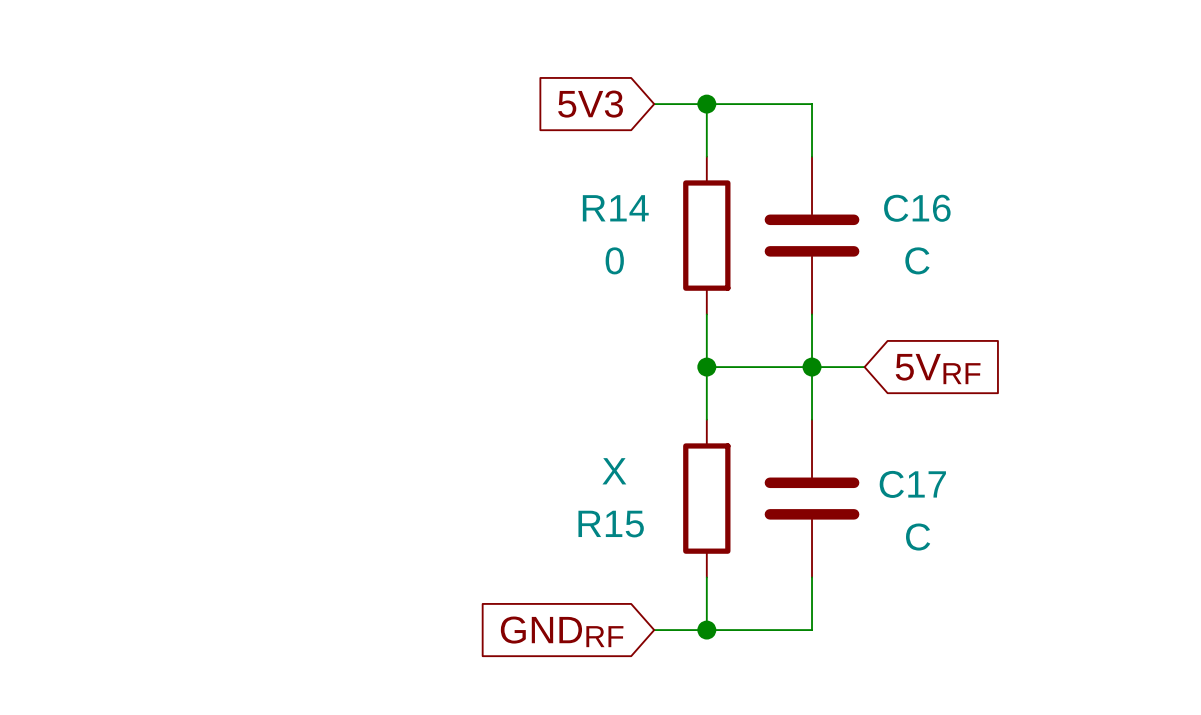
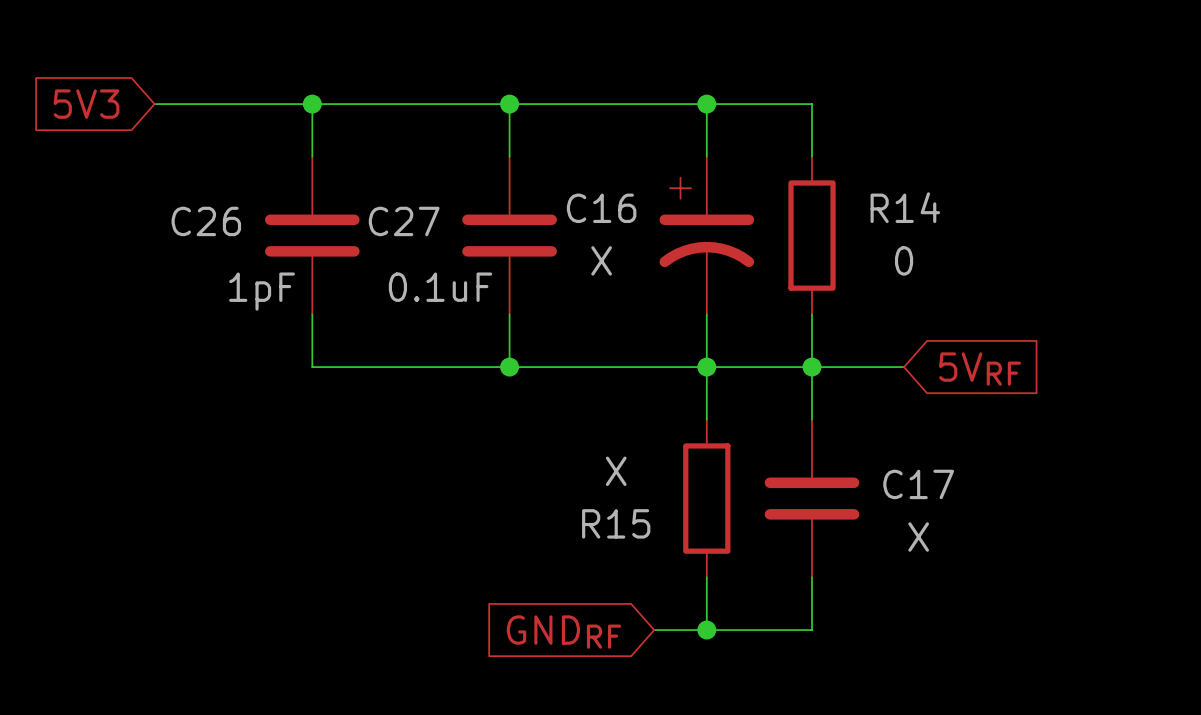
wire: none -> (154, 104) (654, 104)
wire: none -> (312, 104) (312, 156)
junction: none -> (312, 104)
wire: none -> (509, 104) (509, 156)
junction: none -> (509, 104)
global label position: 5V3 (590, 104) -> 5V3 (86, 104)
C16 symbol: [764, 156, 860, 315] -> [659, 156, 755, 315]
R14 name position: R14 (615, 208) -> R14 (905, 207)
C16 name position: C16 (917, 208) -> C16 (601, 208)
C26: none -> 1pF (312, 235)
C27: none -> 0.1uF (509, 235)
R14 position: (706, 235) -> (812, 235)
R14 value position: 0 (614, 260) -> 0 (904, 260)
C16 value: C (917, 260) -> X (601, 260)
wire: none -> (312, 314) (312, 367) (706, 367)
wire: none -> (509, 314) (509, 367)
junction: none -> (509, 367)
wire: none -> (864, 367) (904, 367)
global label position: 5VRF (938, 369) -> 5VRF (980, 369)
C17 value: C (918, 537) -> X (918, 537)

